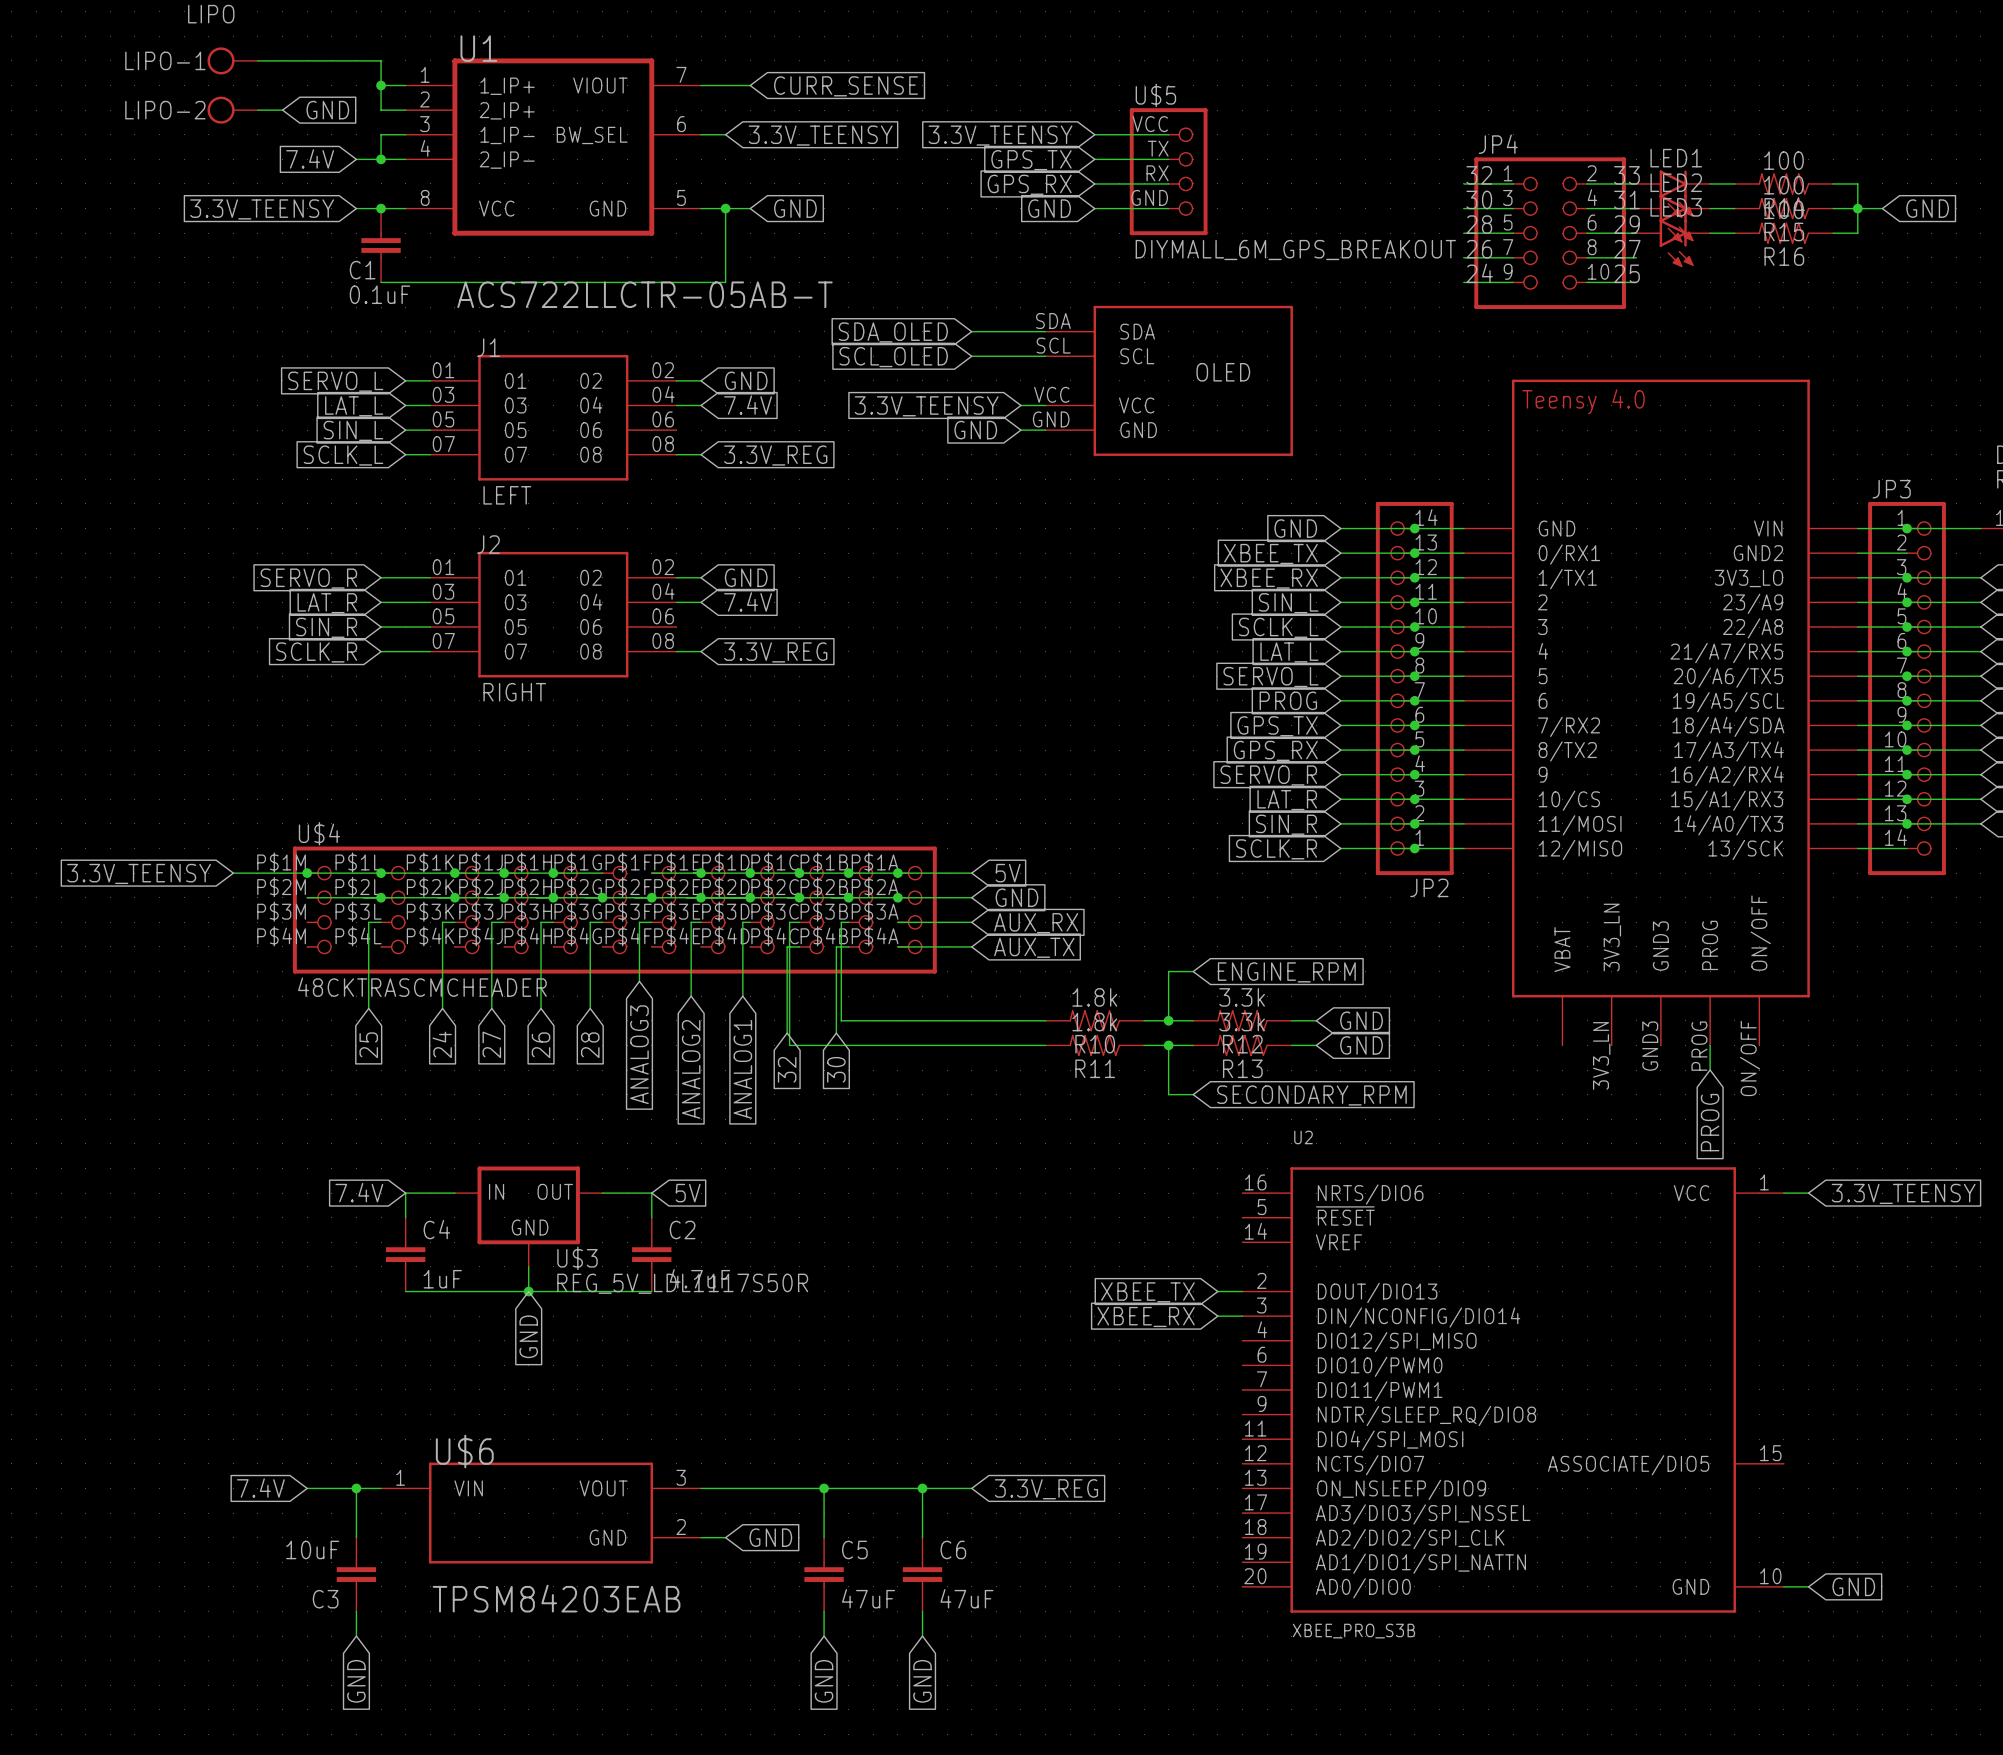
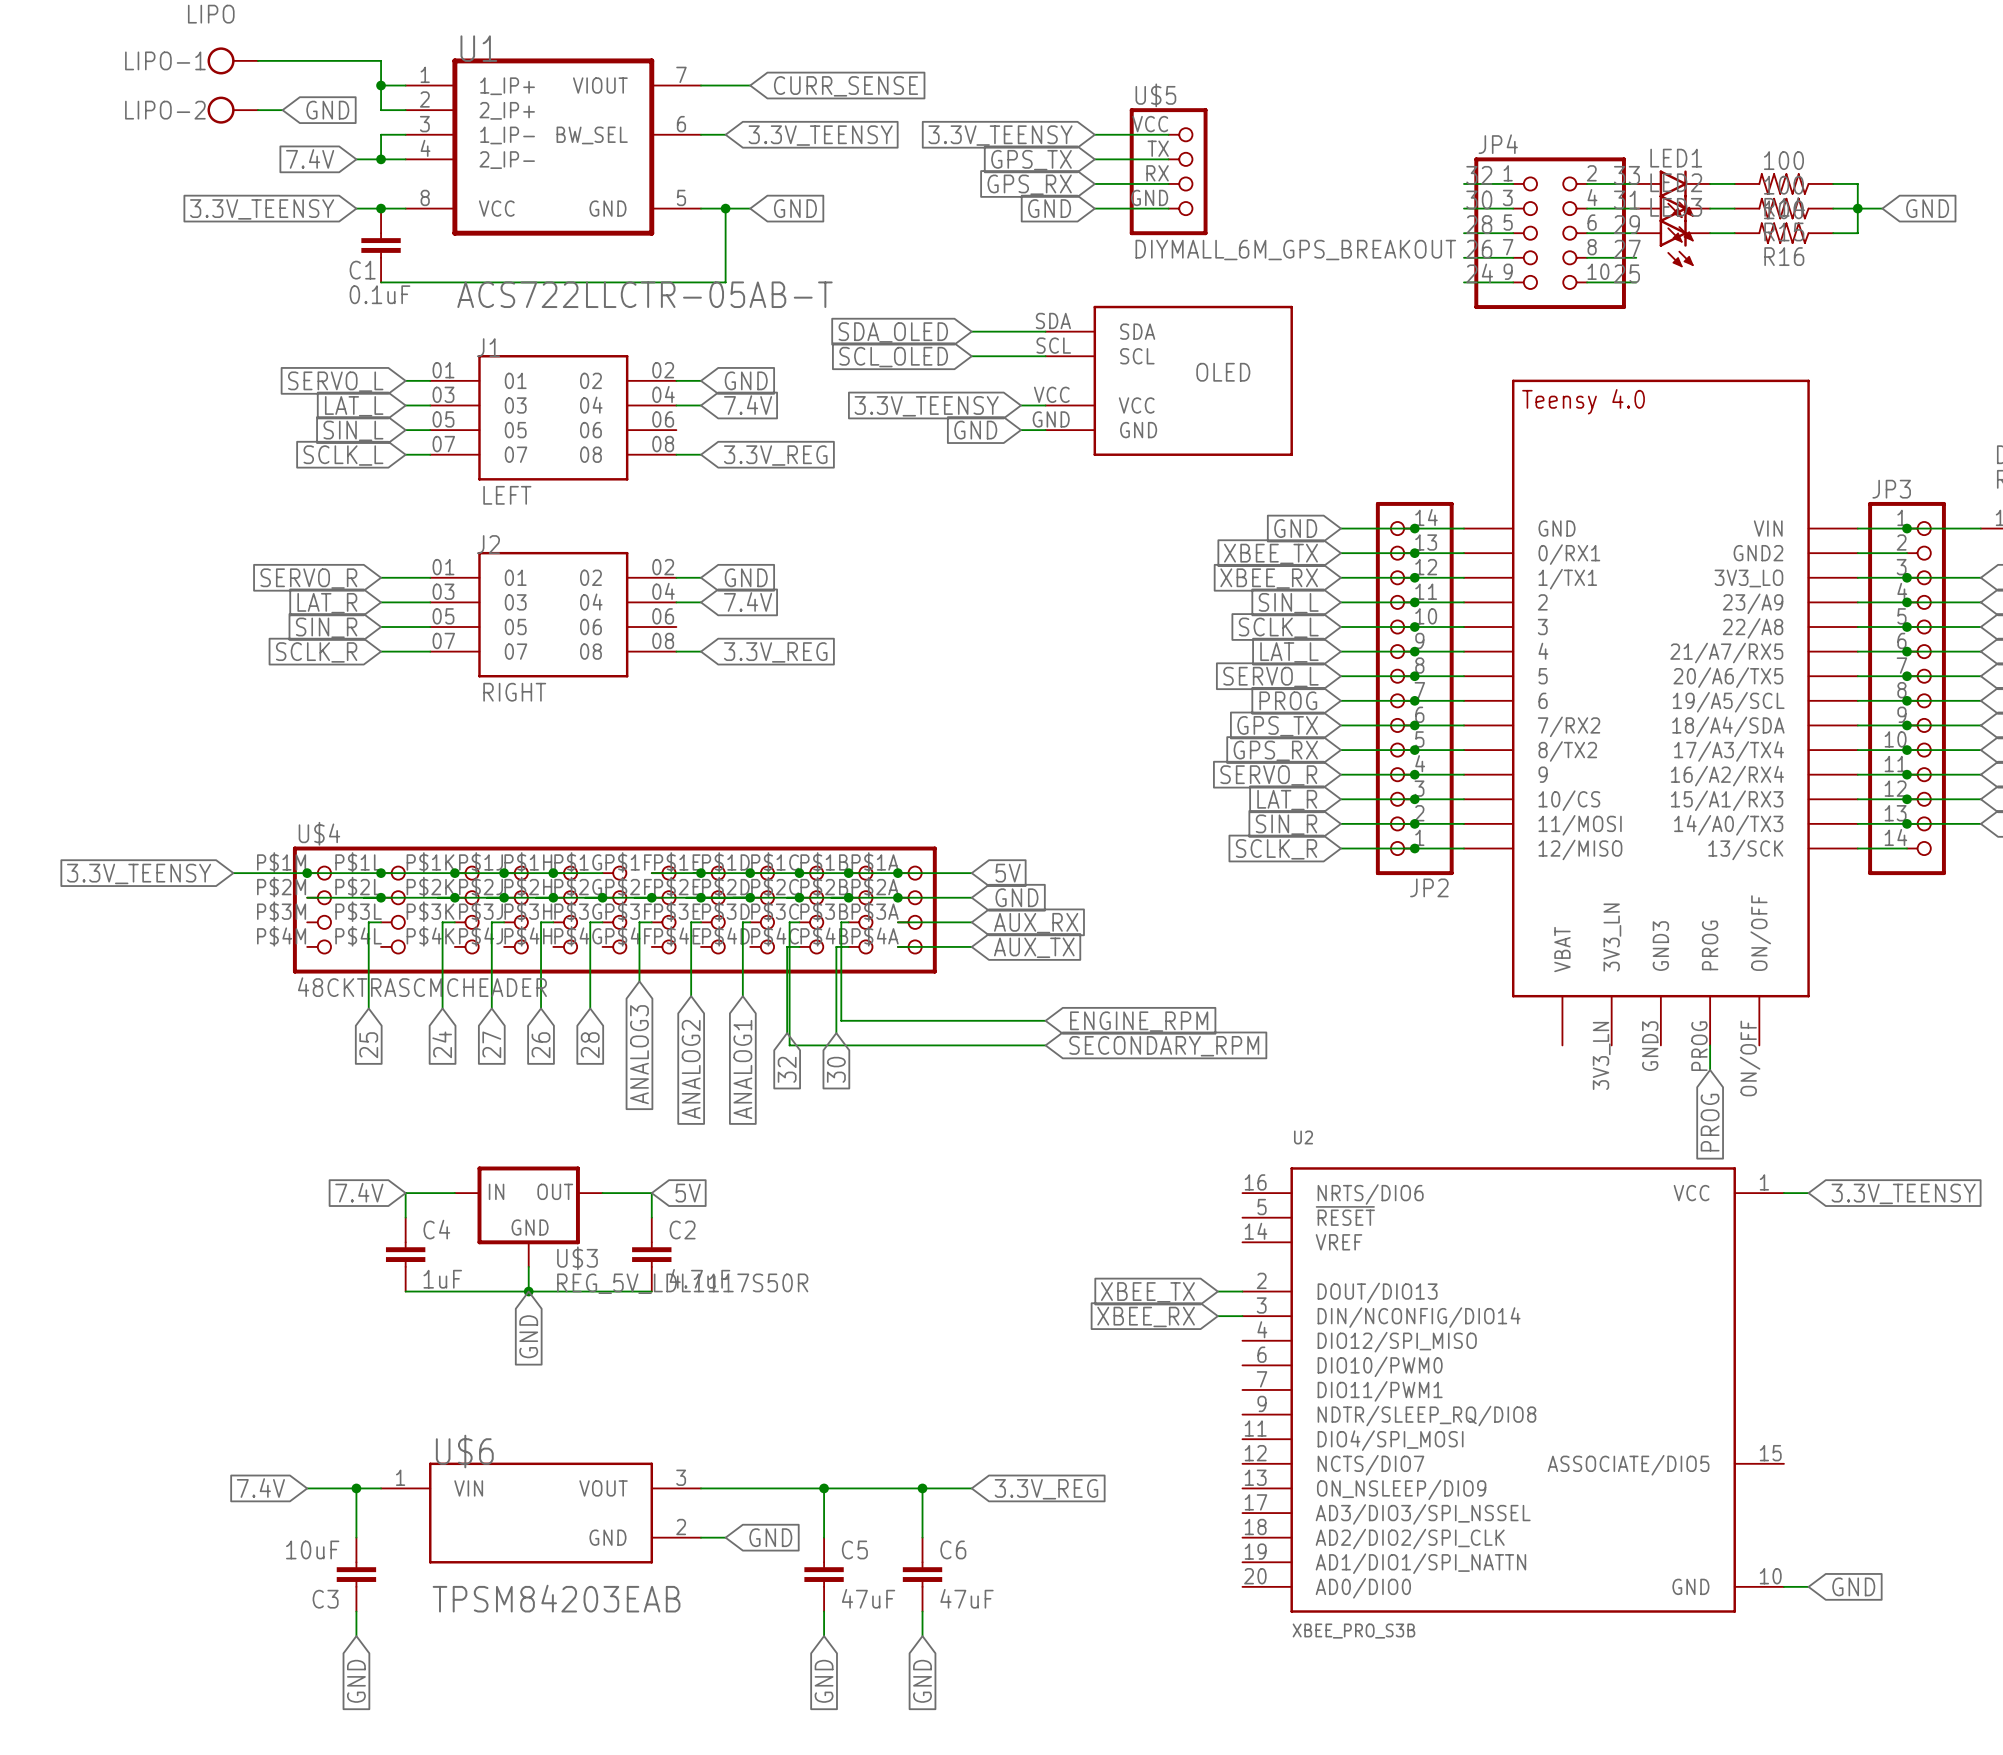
wire: (1193, 971) (1168, 971) (1168, 1020) -> none
global label position: ENGINE_RPM (1286, 972) -> ENGINE_RPM (1139, 1021)
R10: 1.8k (1094, 1020) -> none
wire: (1144, 1020) (1193, 1020) -> none
junction: (1168, 1020) -> none
R12: 3.3k (1242, 1020) -> none
wire: (1291, 1020) (1316, 1020) -> none
global label: GND (1361, 1020) -> none
R11: 1.8k (1094, 1045) -> none
wire: (1144, 1045) (1193, 1045) -> none
wire: (1168, 1045) (1168, 1094) (1193, 1094) -> none
junction: (1168, 1045) -> none
R13: 3.3k (1242, 1045) -> none
wire: (1291, 1045) (1316, 1045) -> none
global label: GND (1361, 1045) -> none
global label position: SECONDARY_RPM (1311, 1095) -> SECONDARY_RPM (1164, 1046)

